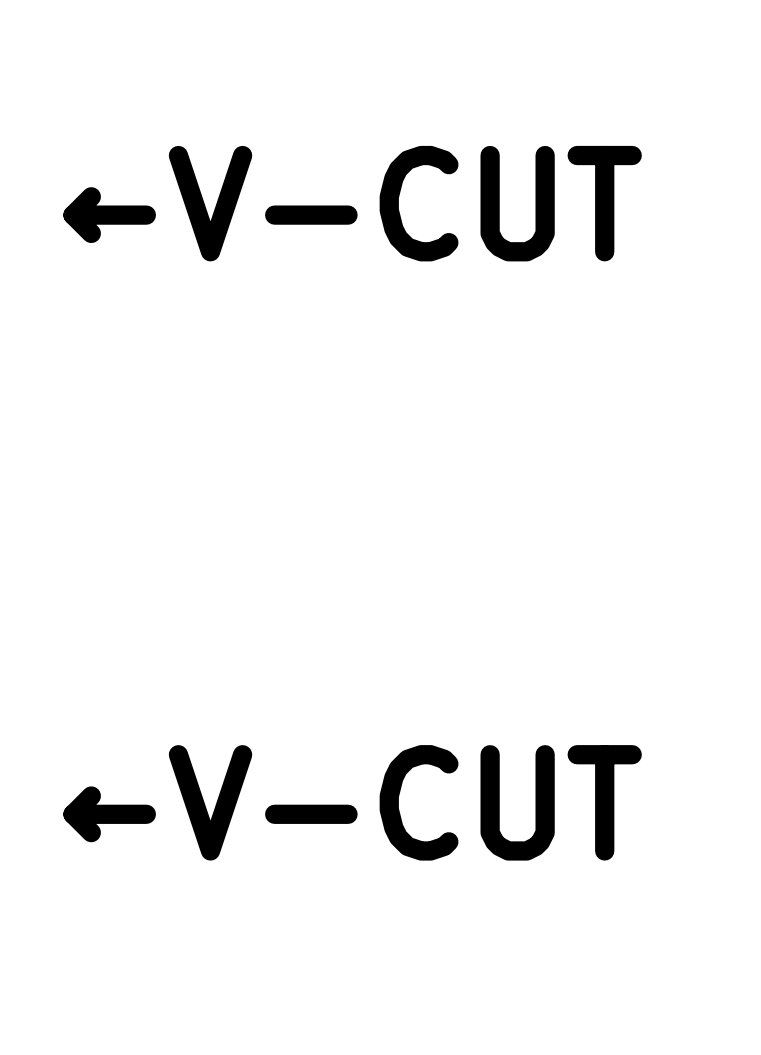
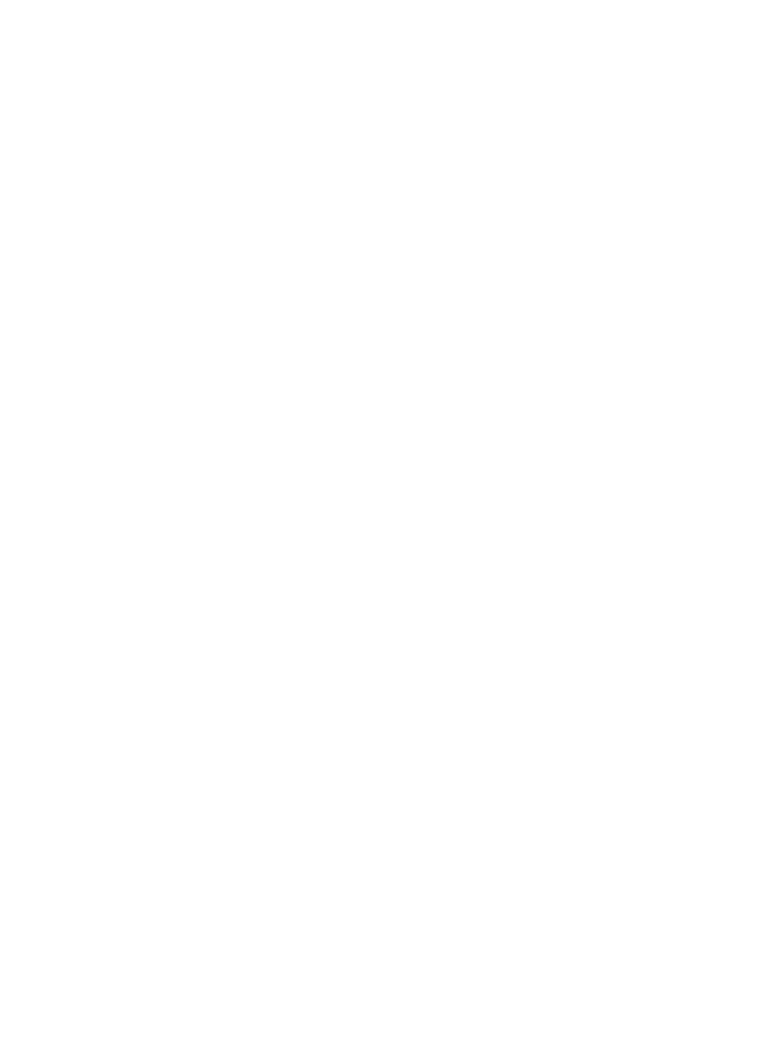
text: ←V-CUT (352, 203) -> none
text: ←V-CUT (352, 802) -> none

